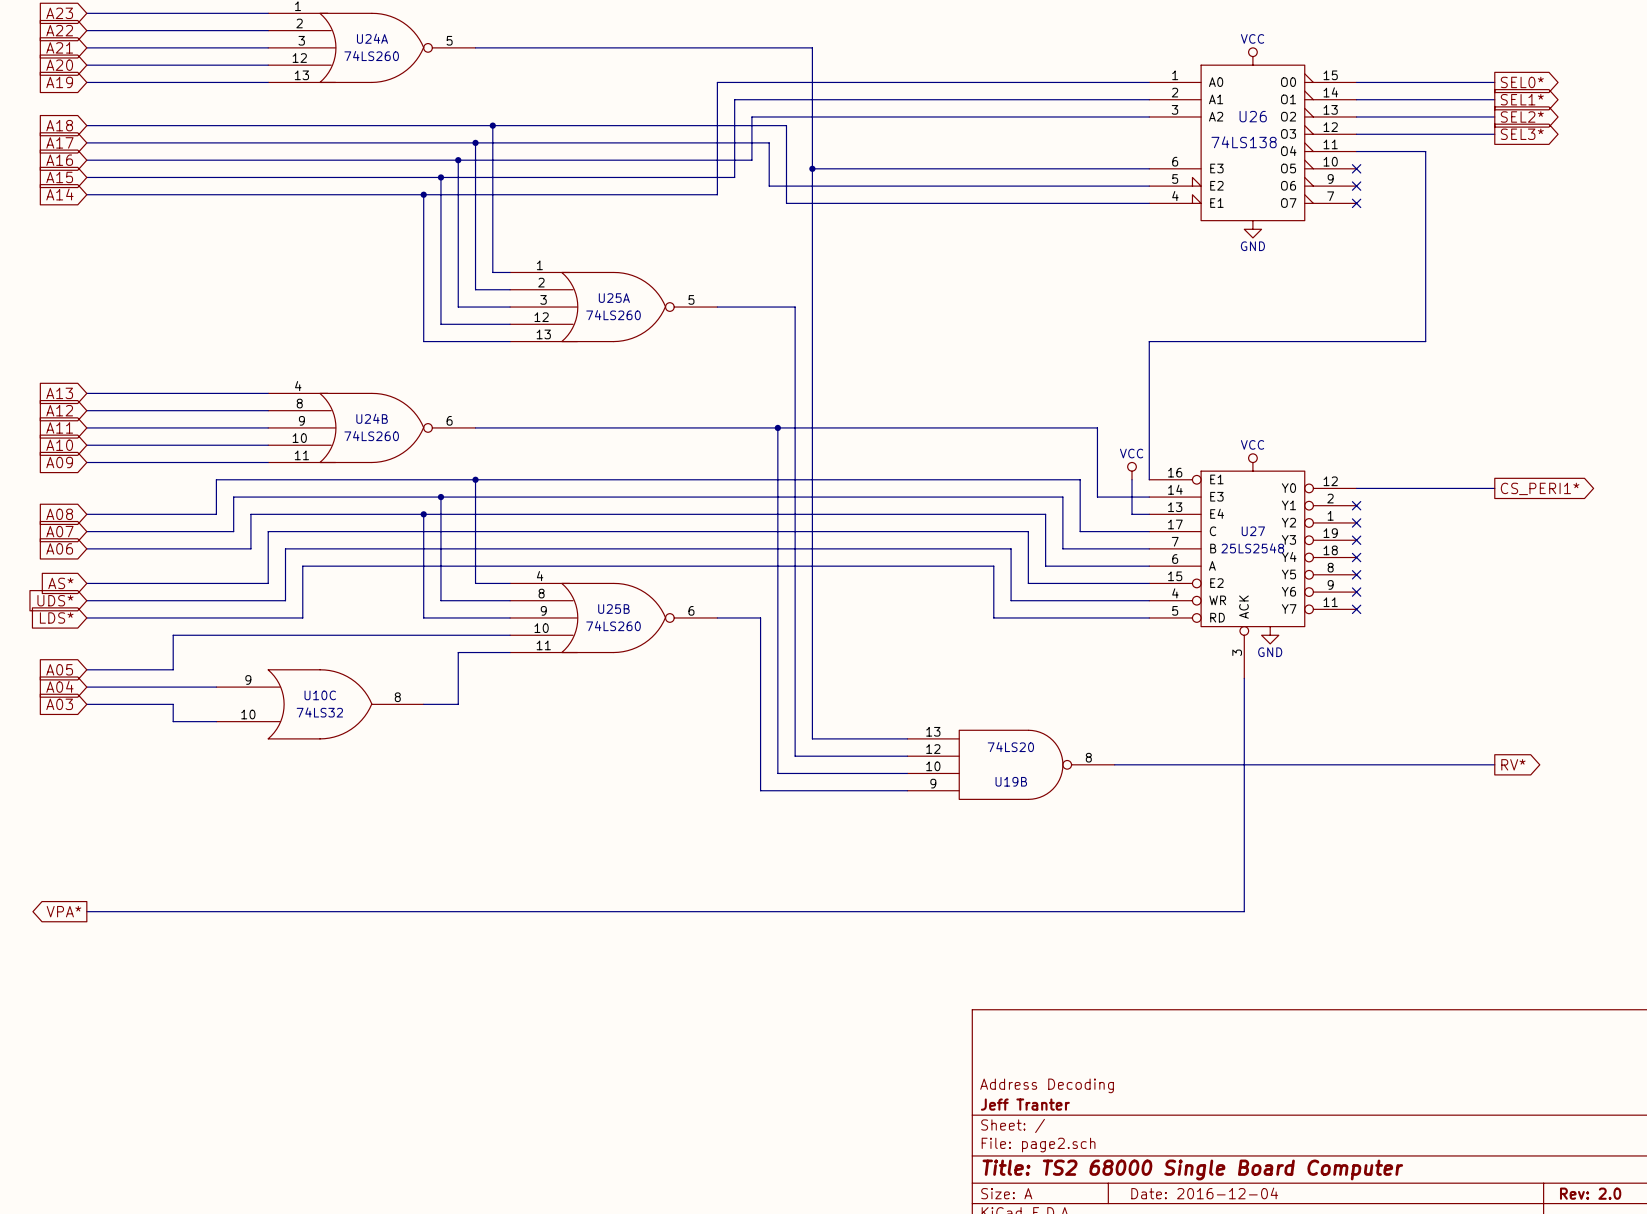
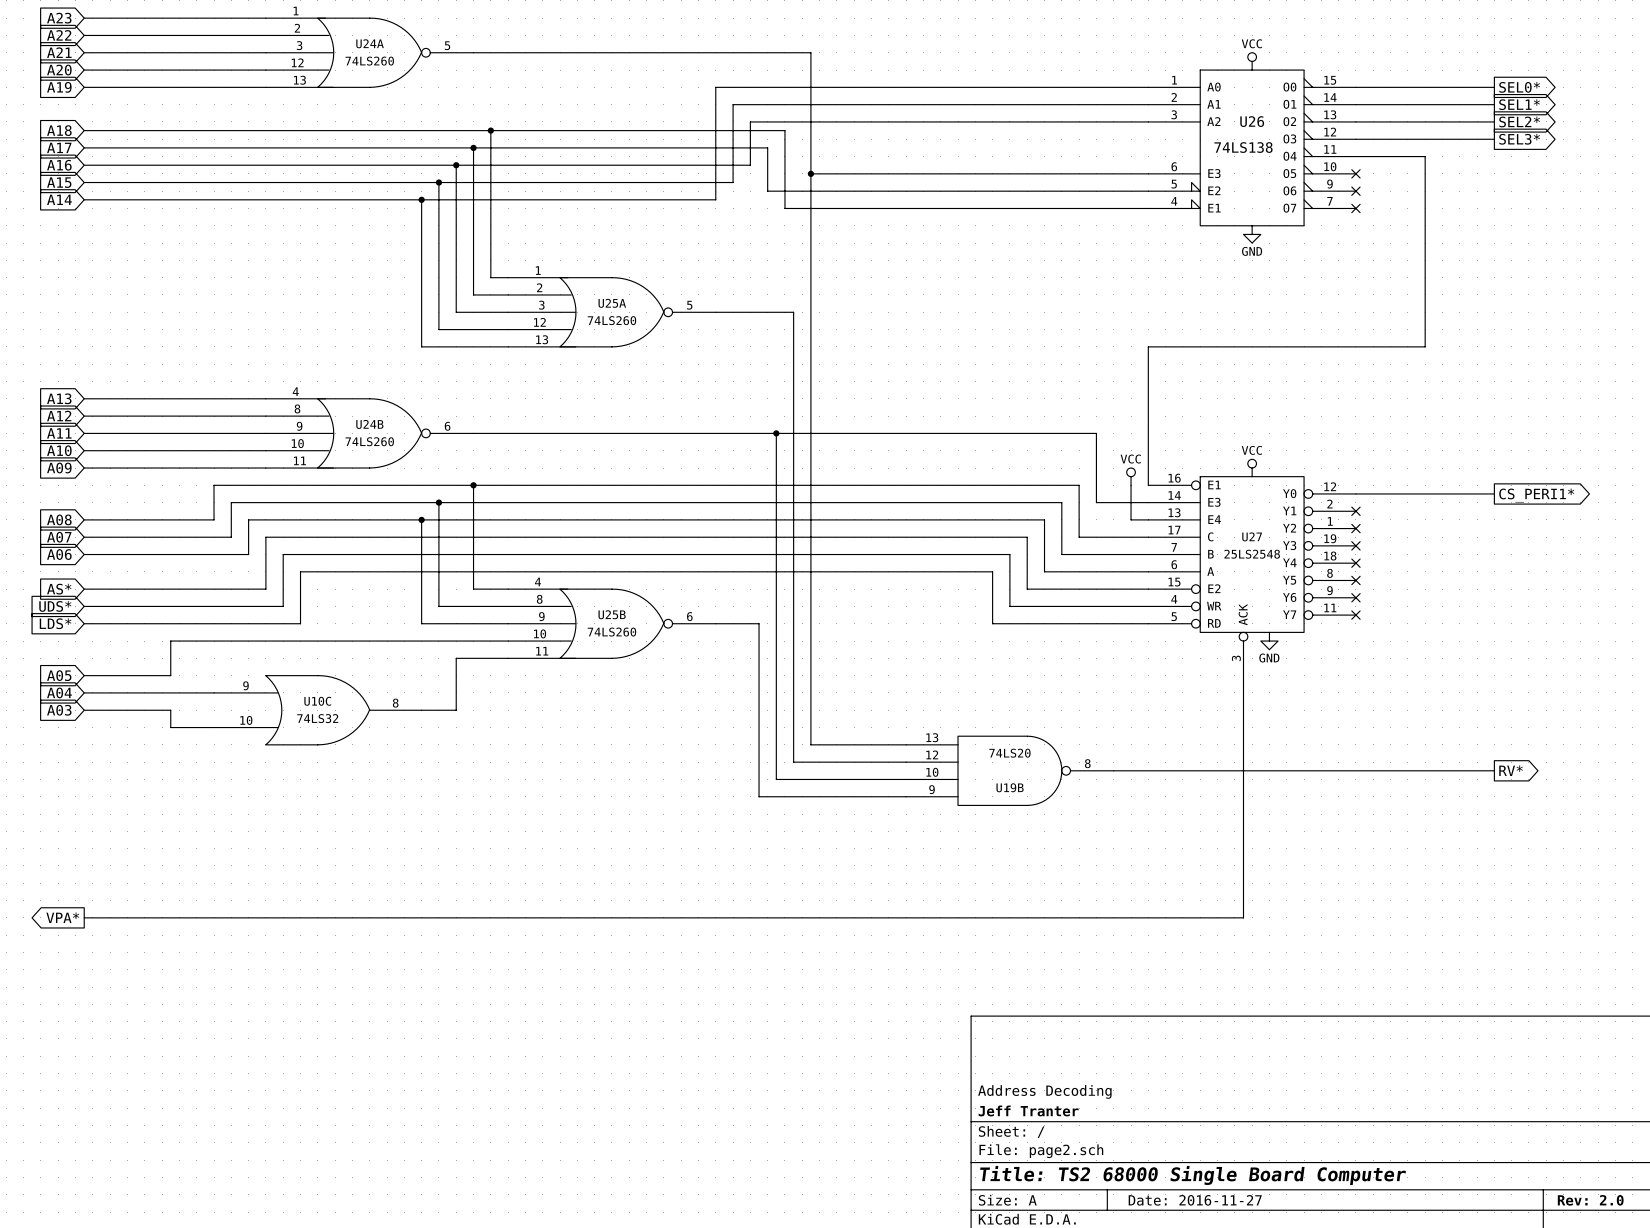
title block: Date: 2016-12-04 (1204, 1193) -> Date: 2016-11-27 (1195, 1200)

